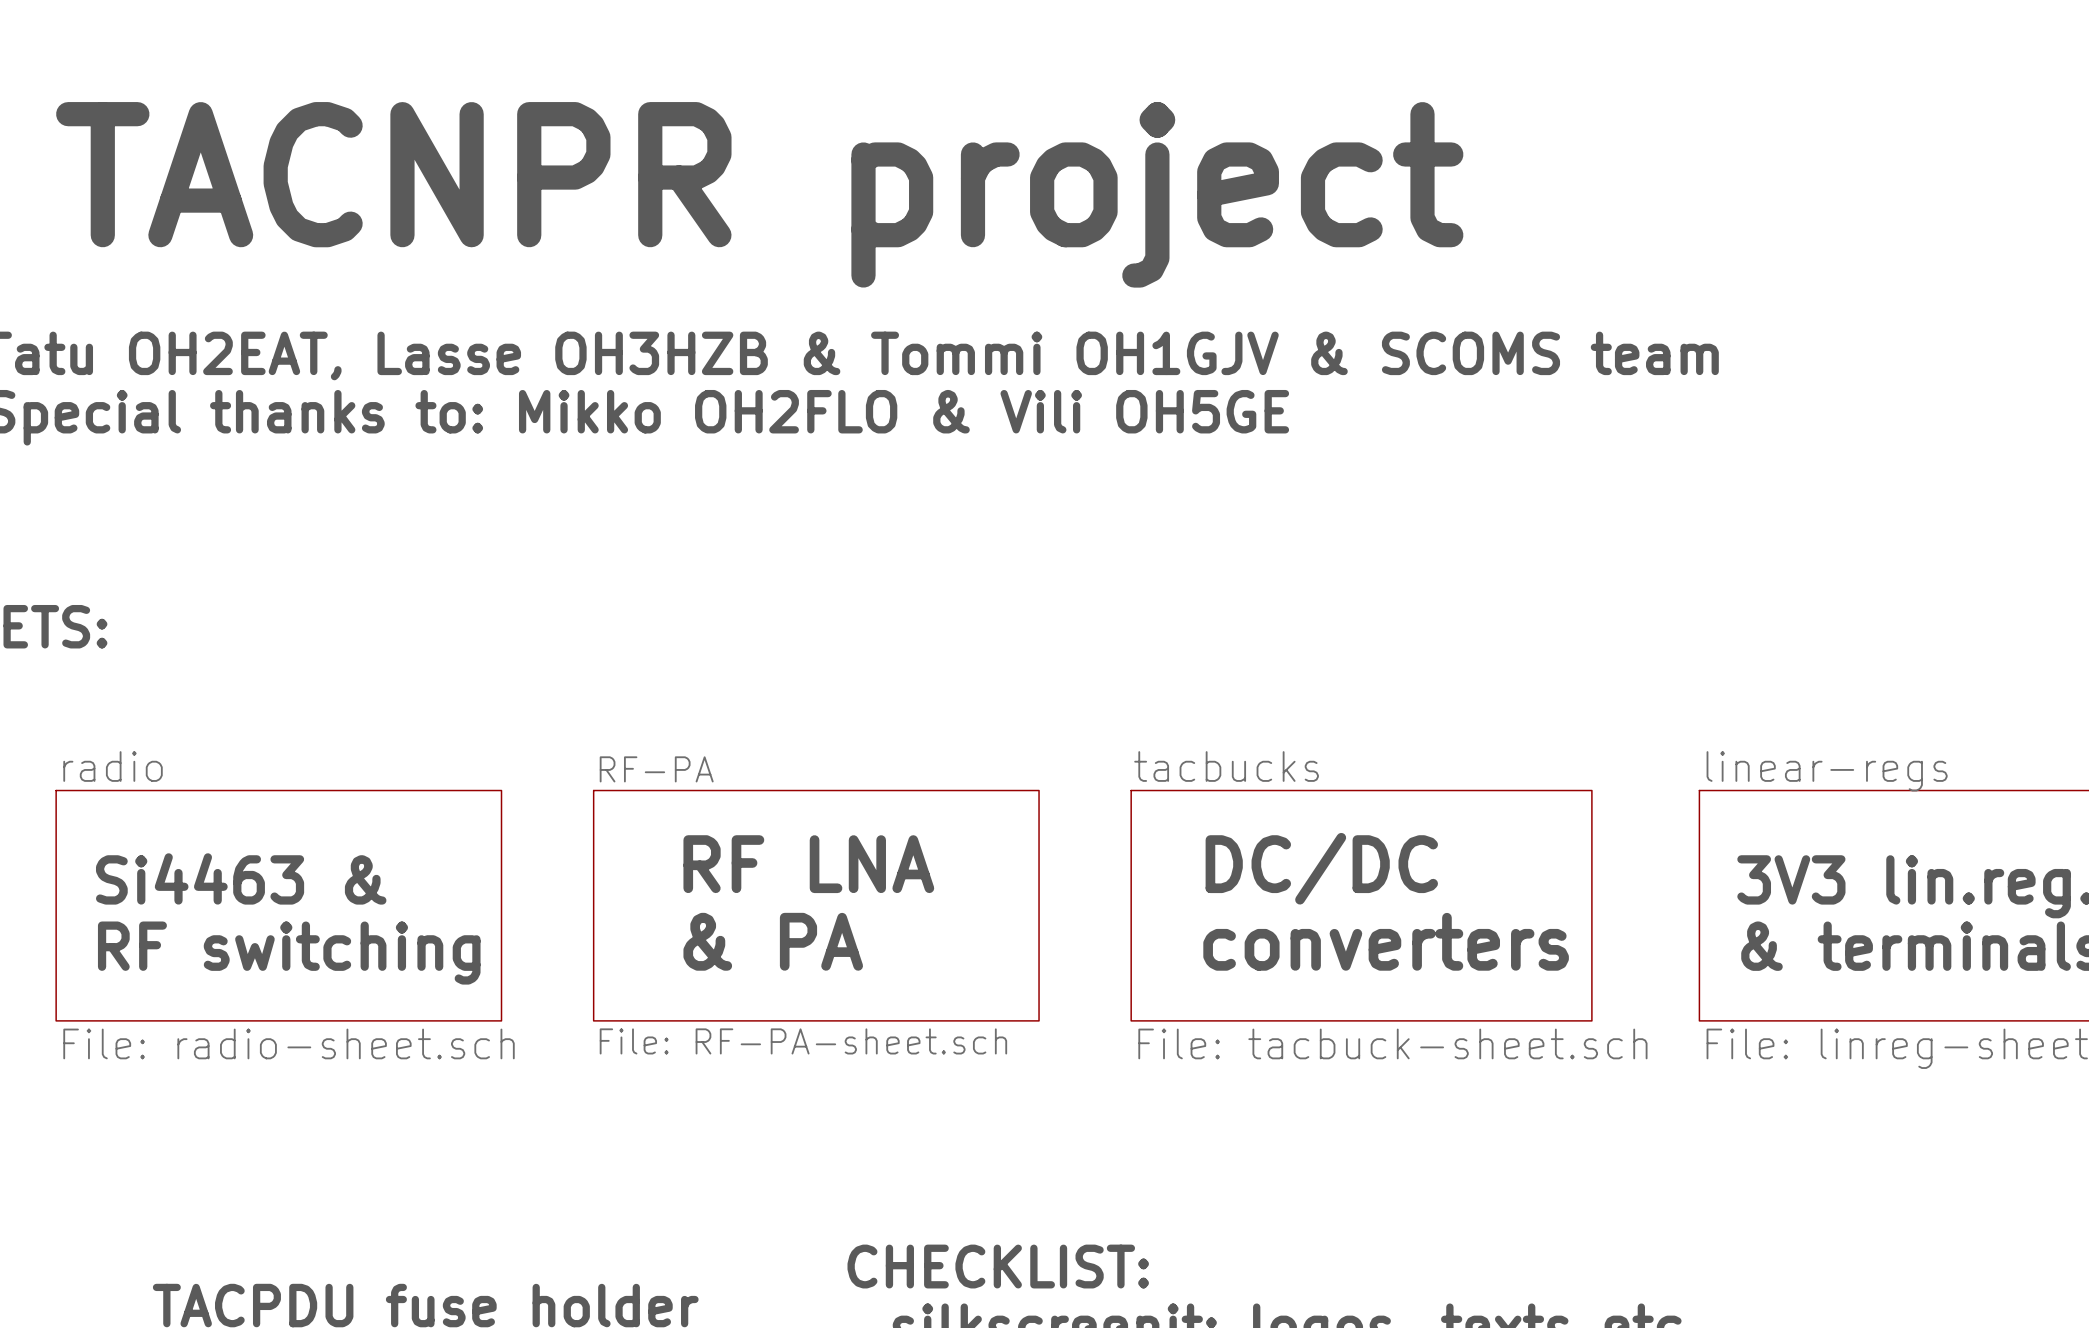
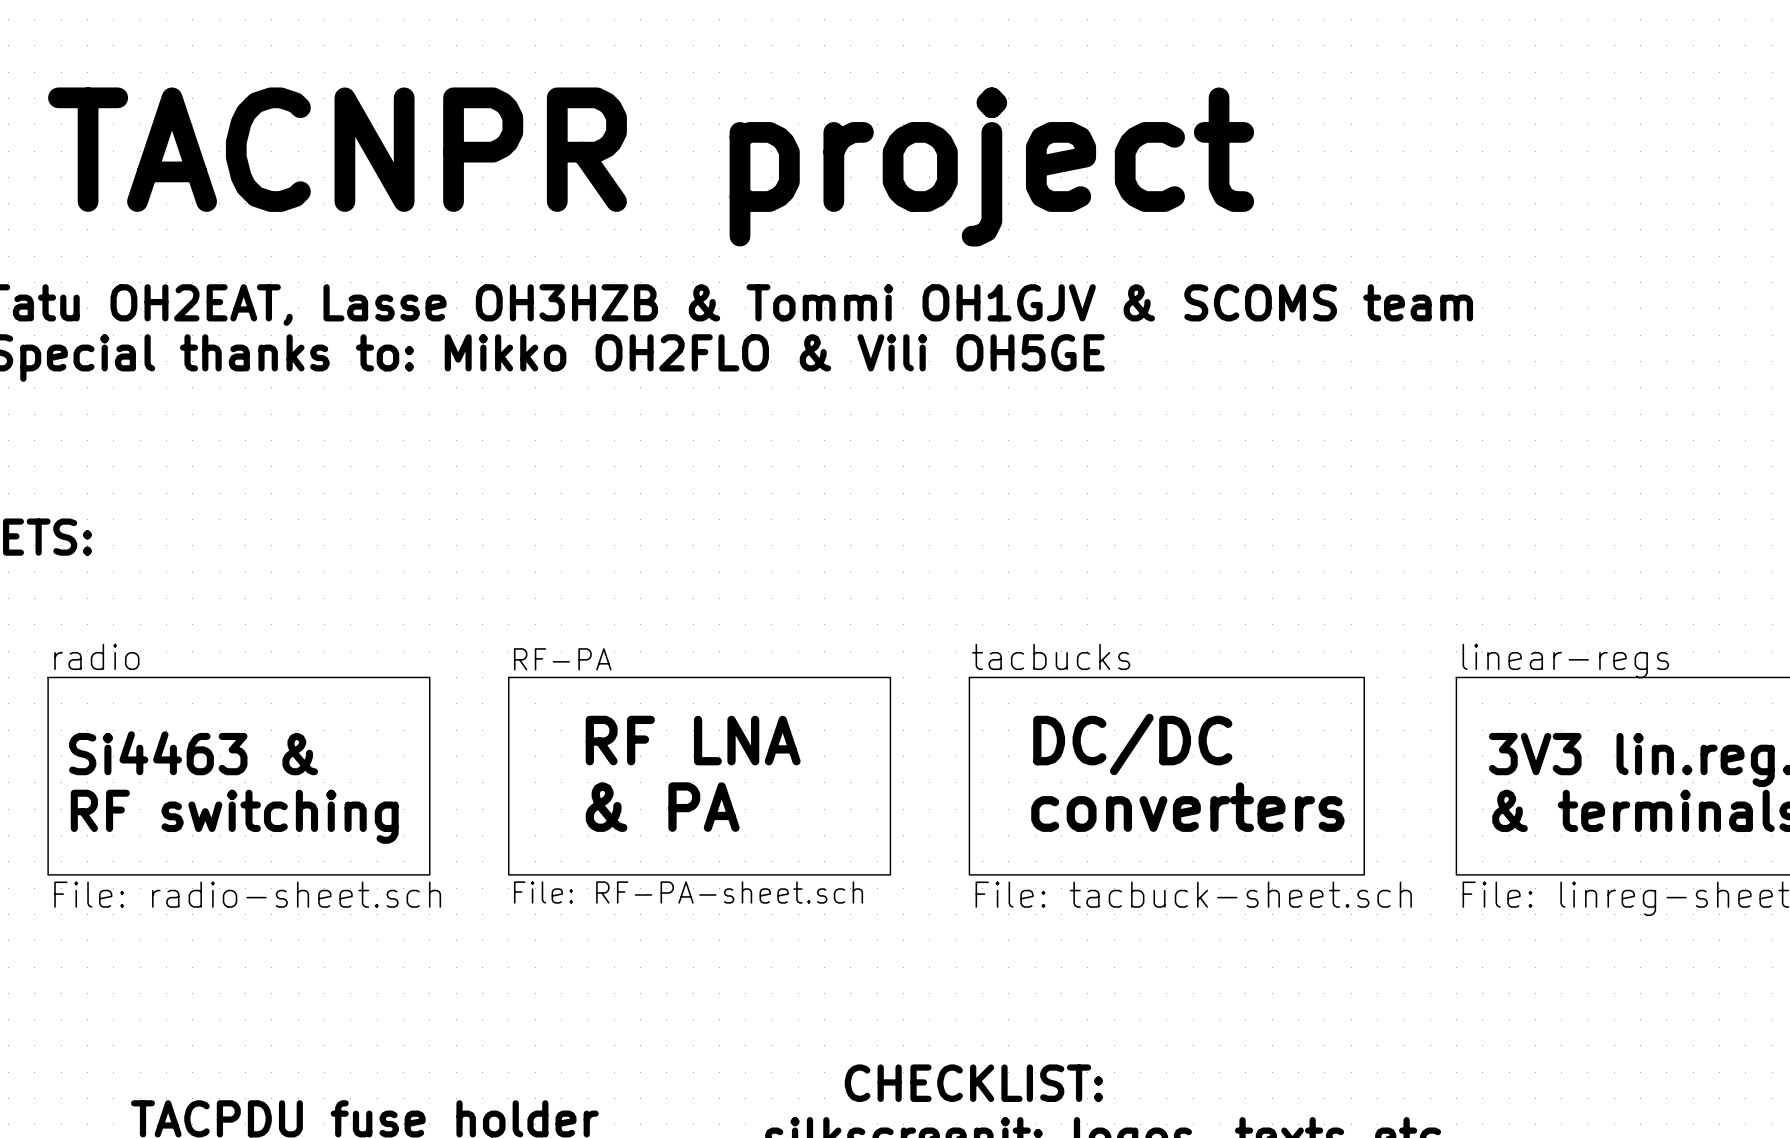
text position: Si4463 & (241, 878) -> Si4463 & (193, 753)
text position: RF switching (289, 953) -> RF switching (234, 816)
text position: CHECKLIST: (998, 1266) -> CHECKLIST: (973, 1083)

